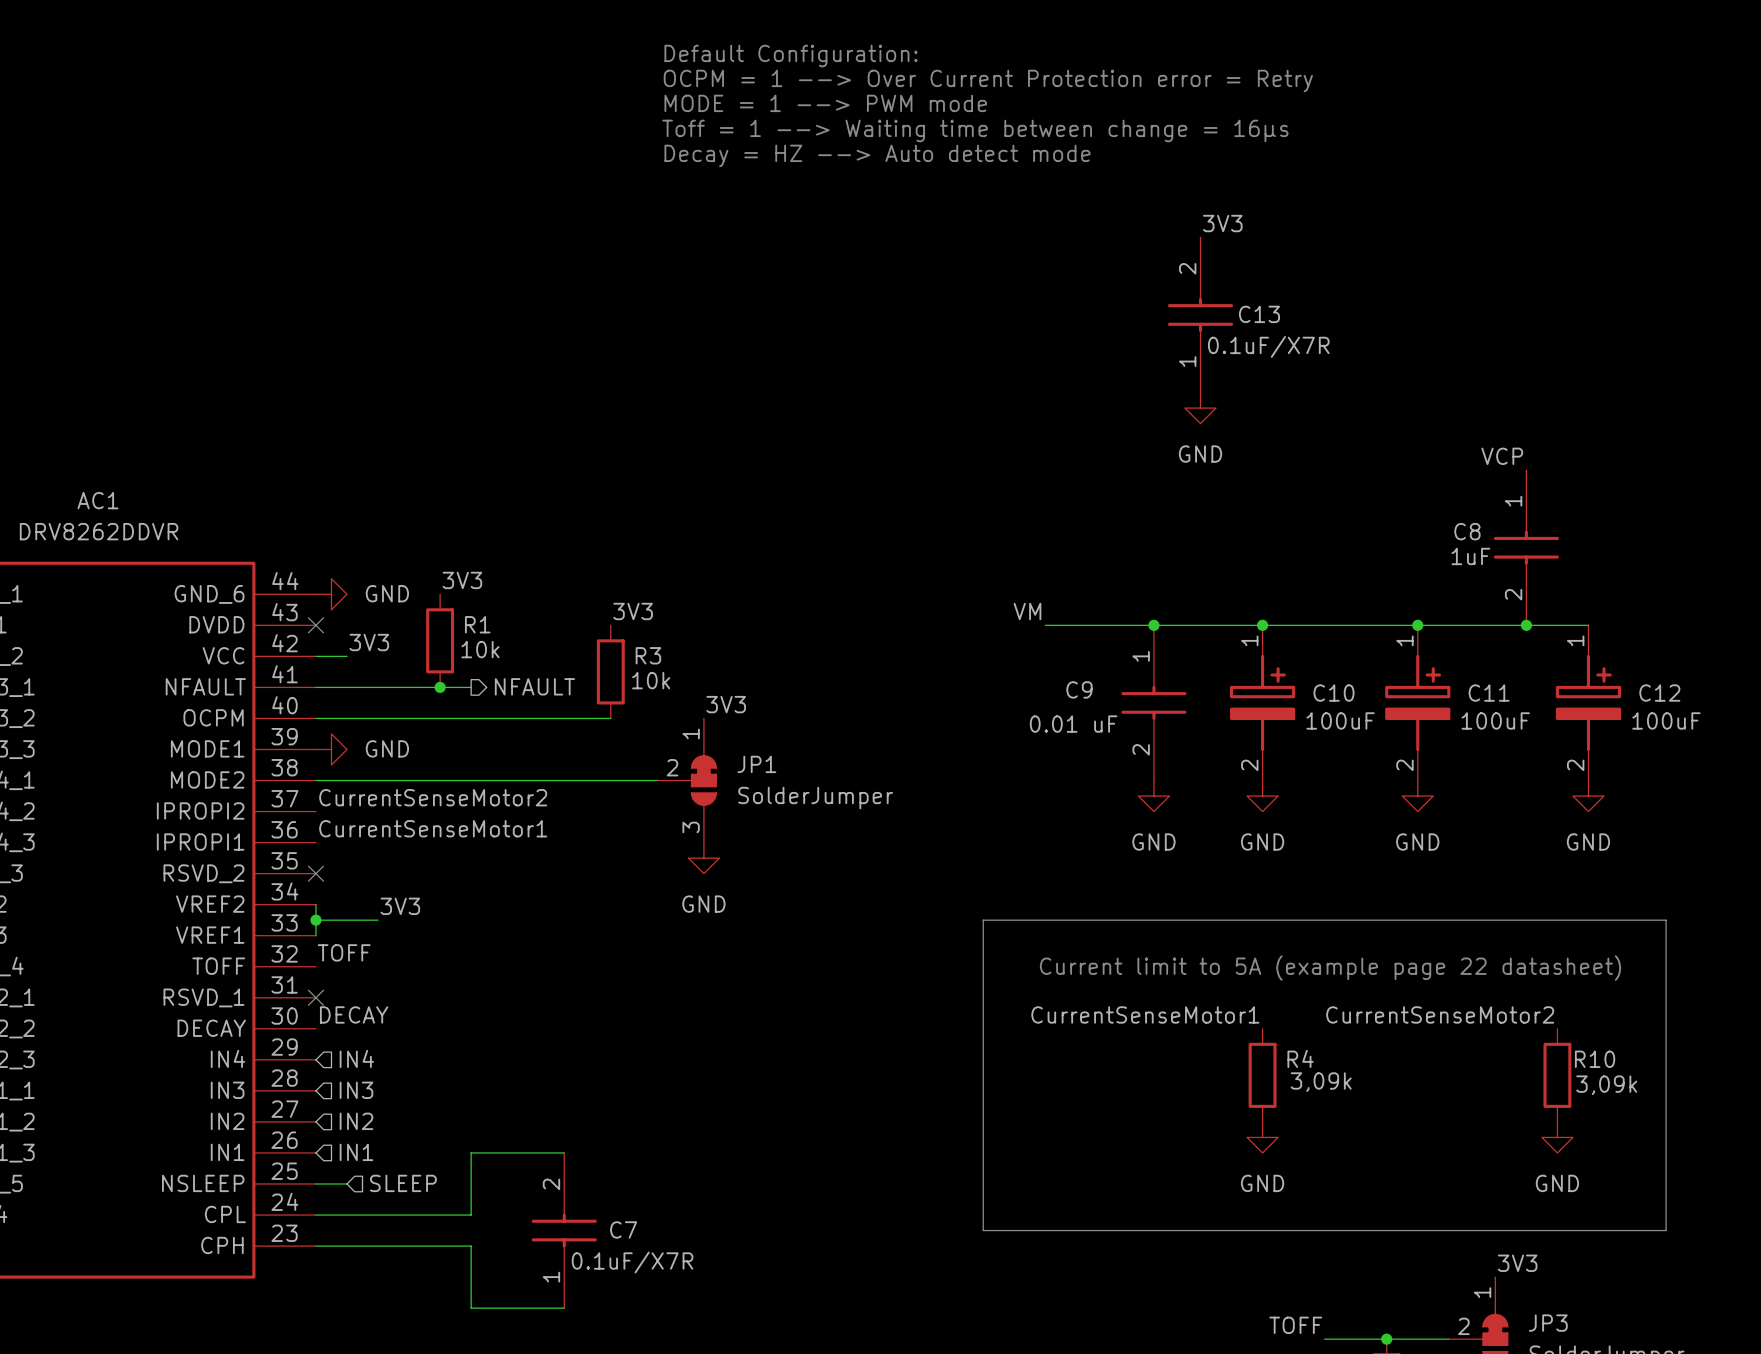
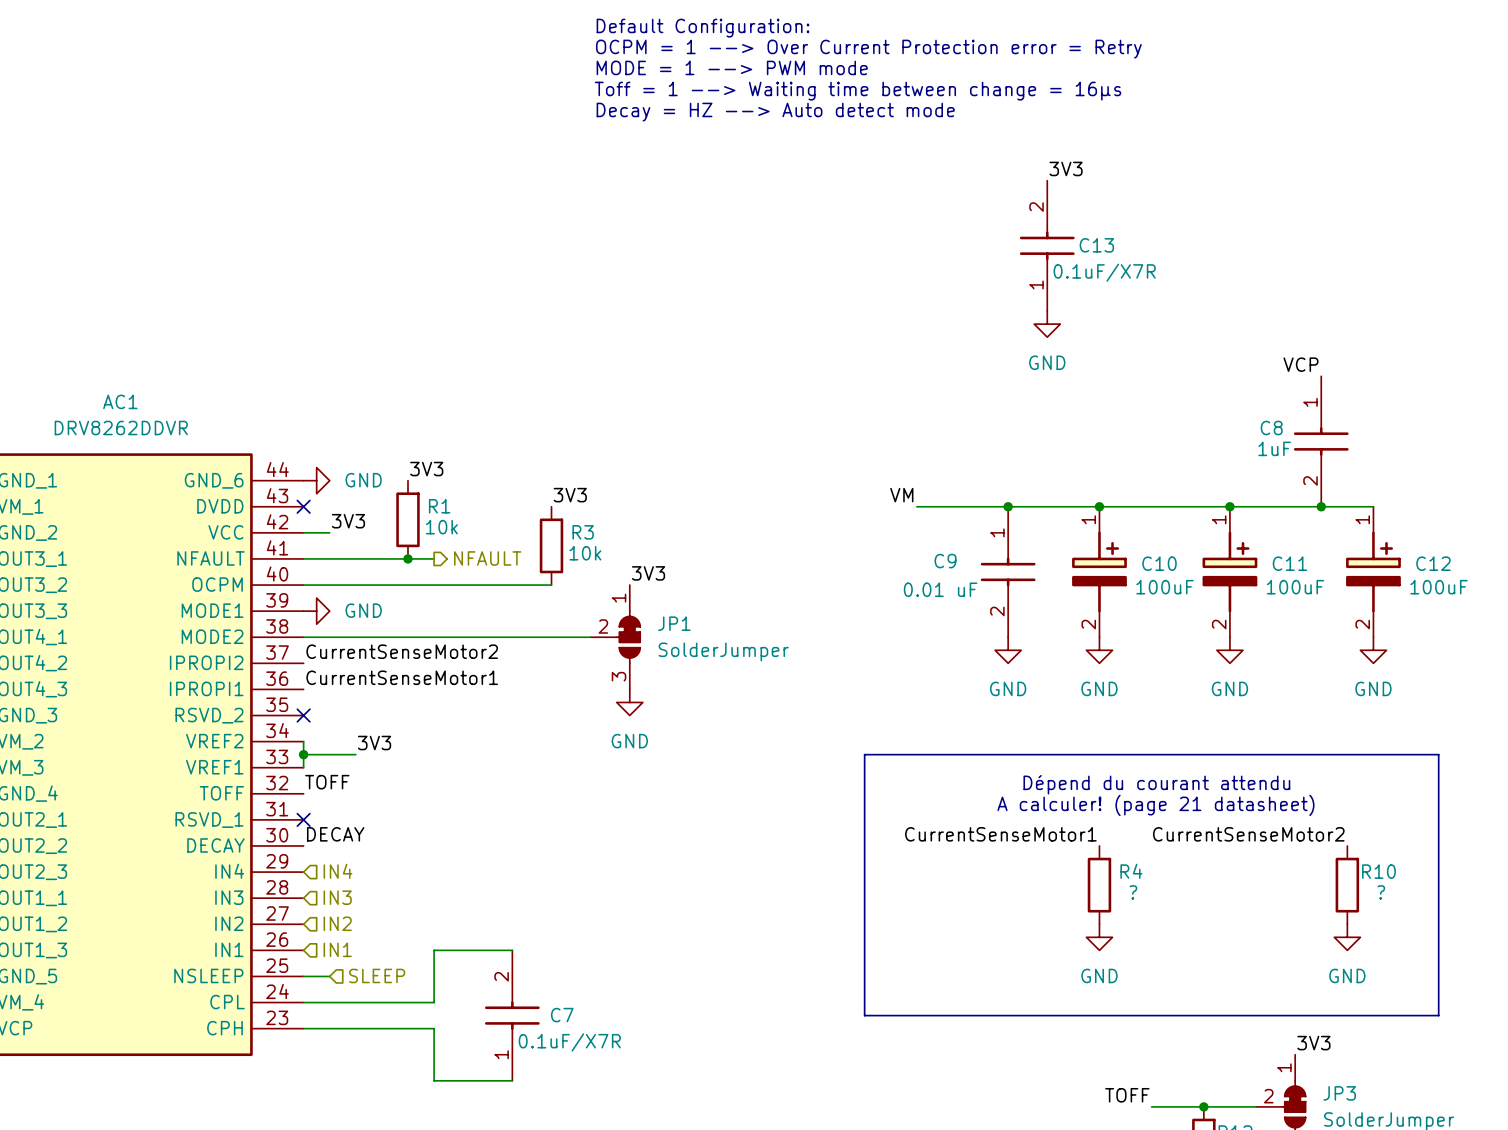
text: none -> Dépend du courant attendu (1156, 784)
text: Current limit to 5A (example page 22 datasheet) (1330, 968) -> none
text: none -> A calculer! (page 21 datasheet) (1155, 805)
R4 value: 3,09k (1321, 1082) -> ? (1133, 892)
R10 value: 3,09k (1606, 1085) -> ? (1381, 892)

